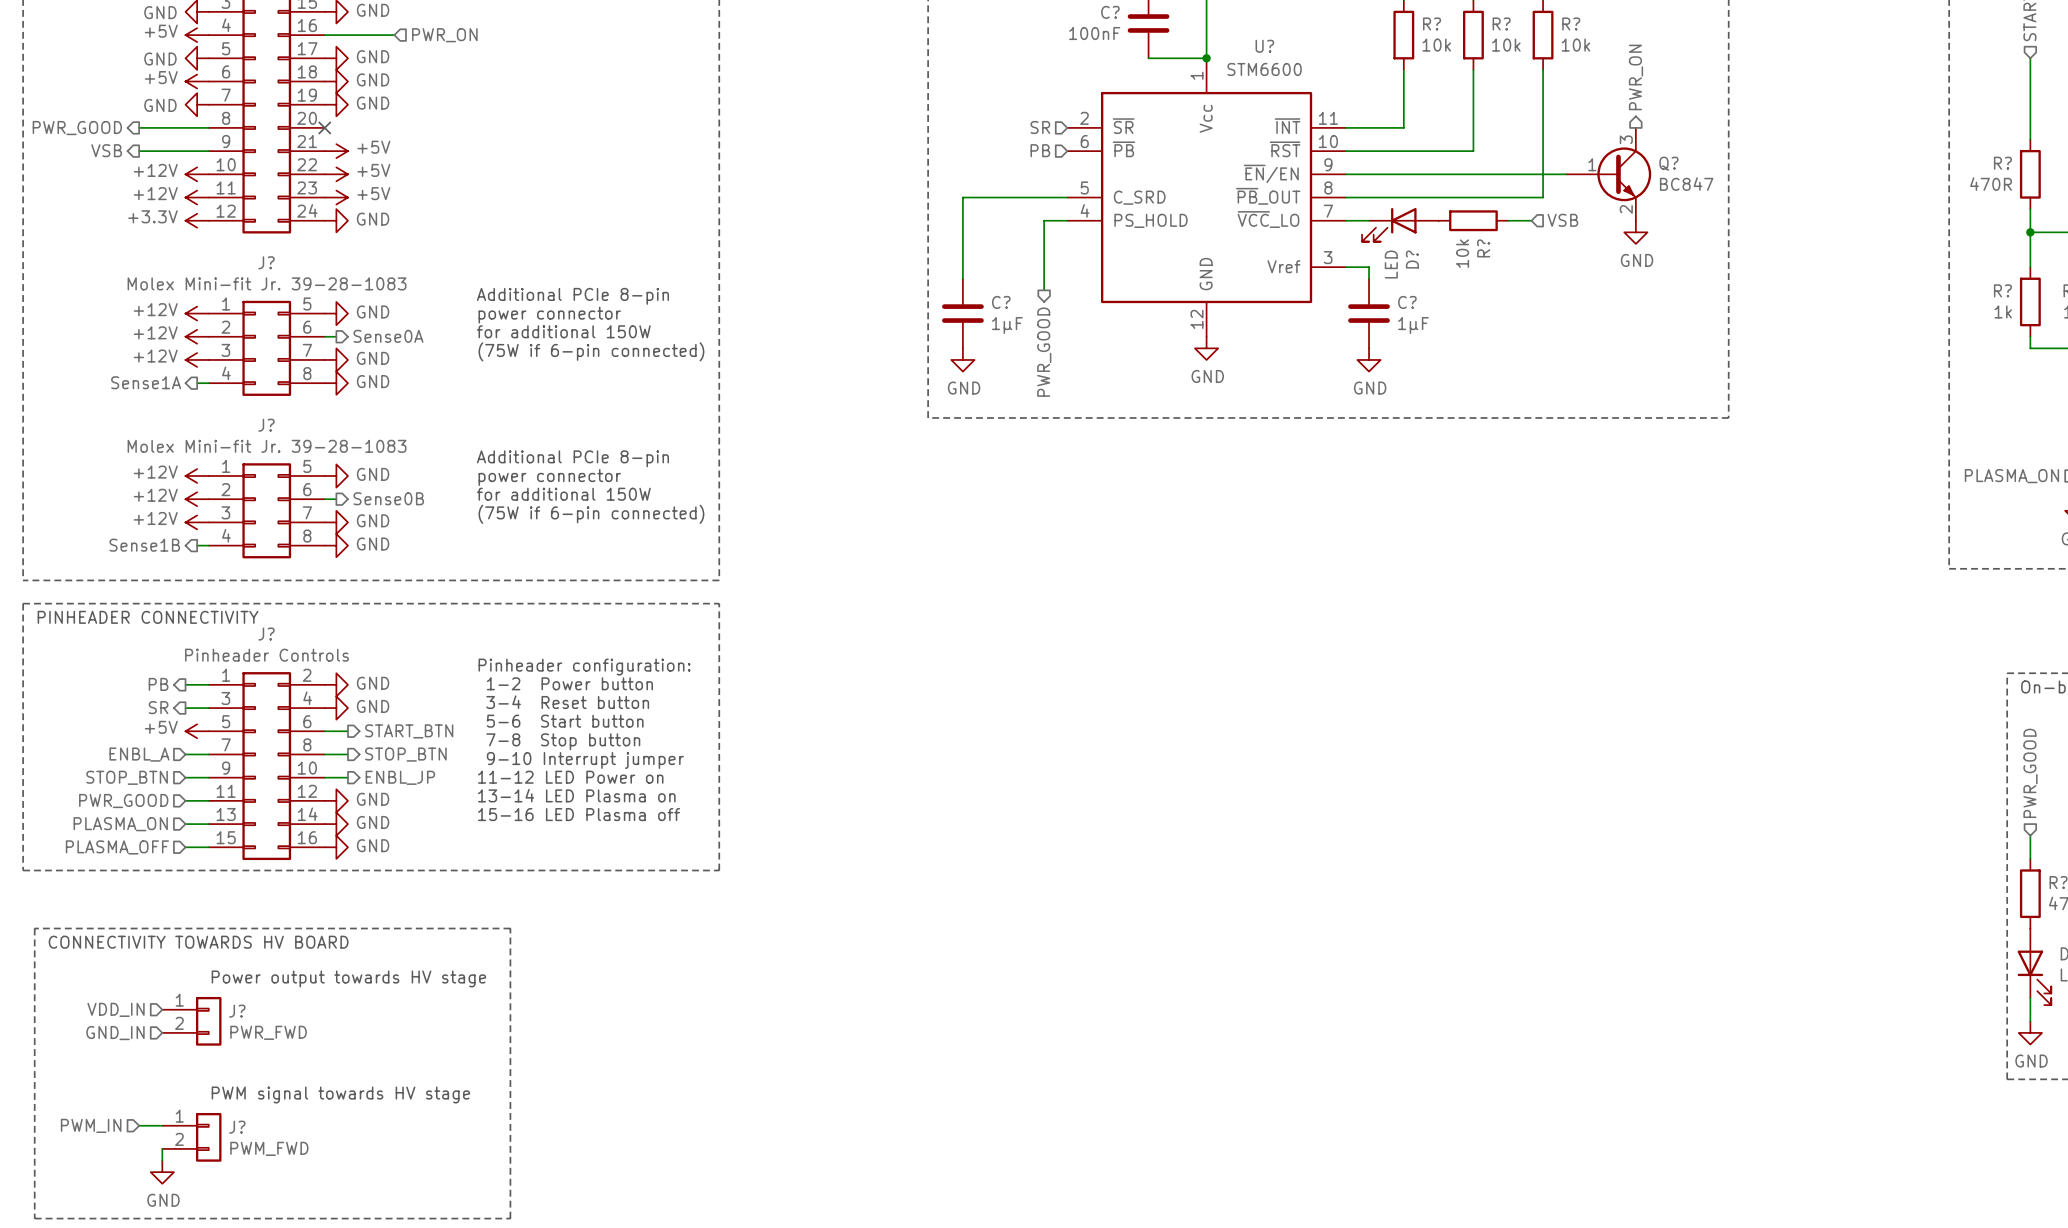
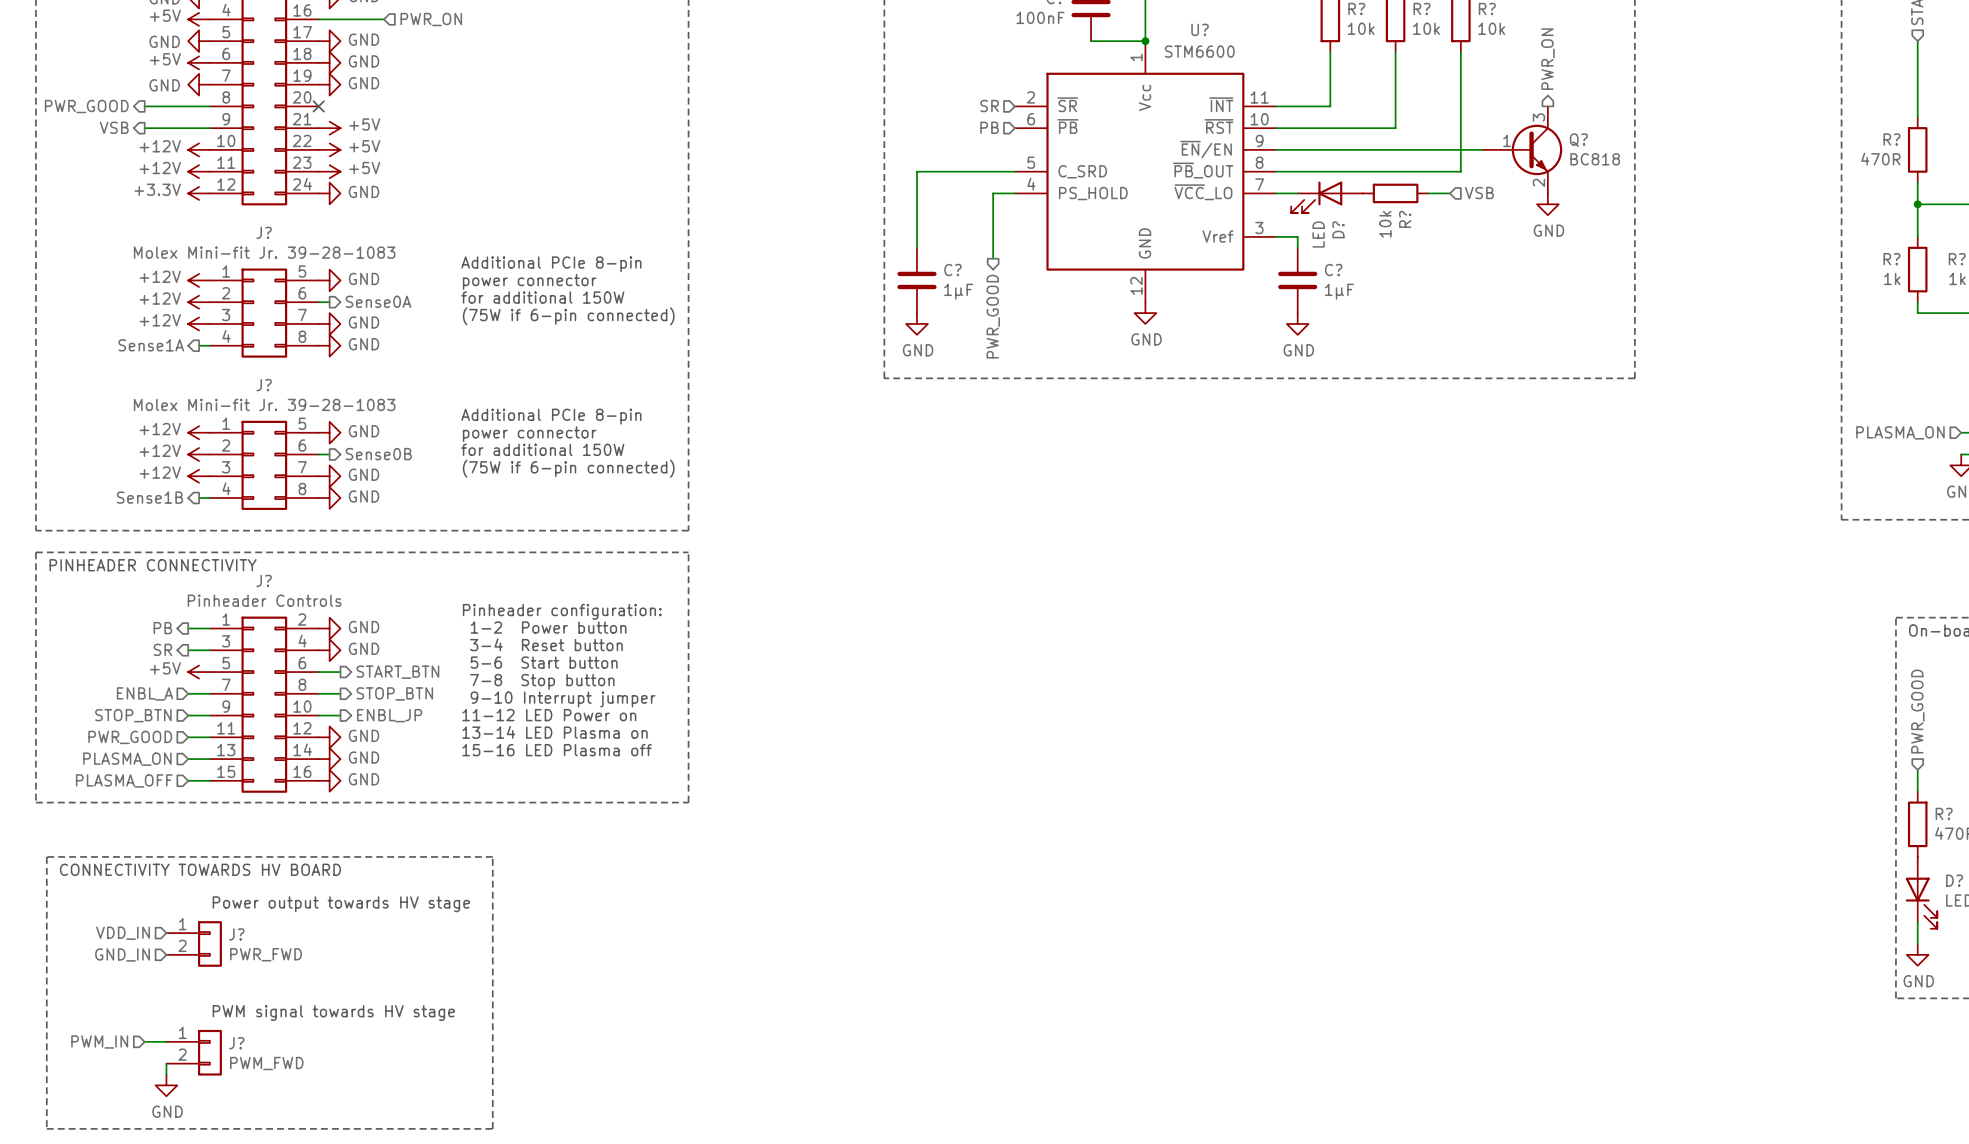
Q? value: BC847 (1686, 184) -> BC818 (1595, 159)

